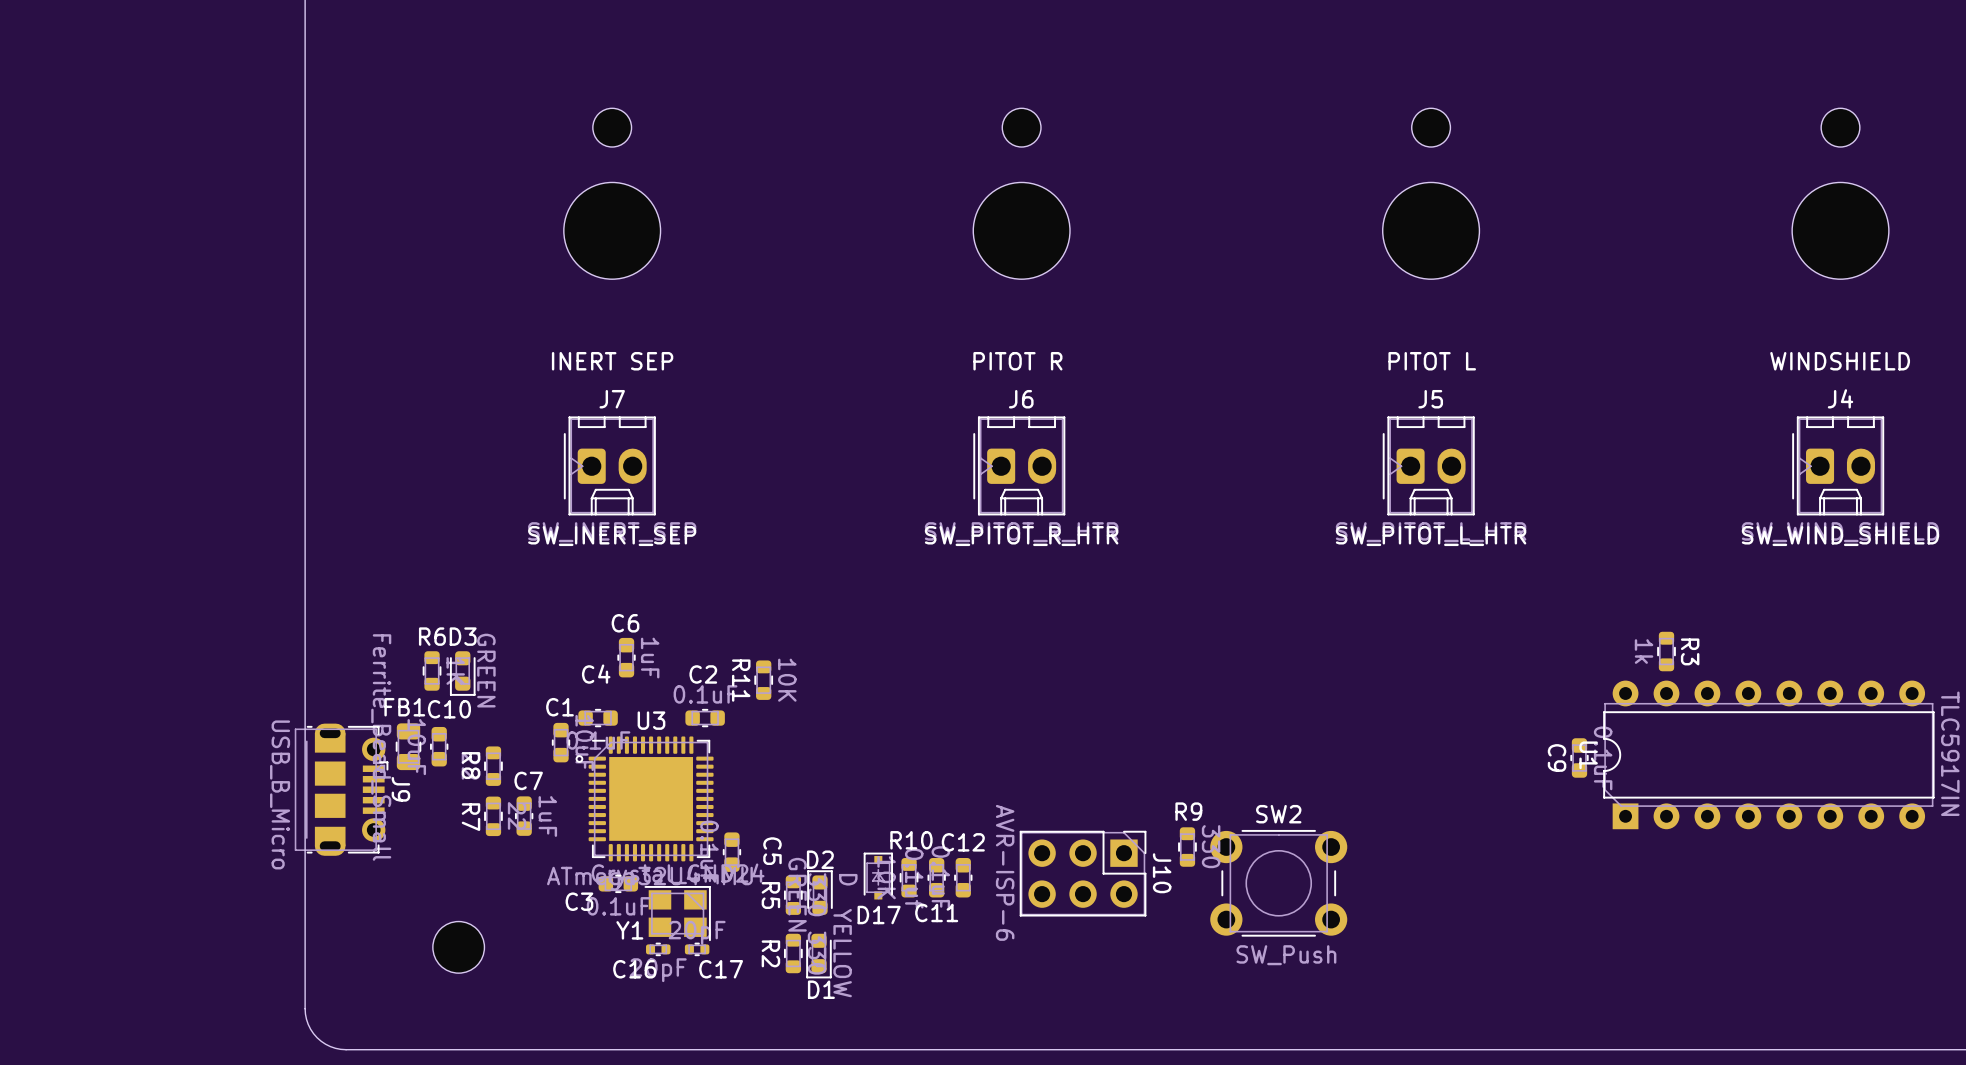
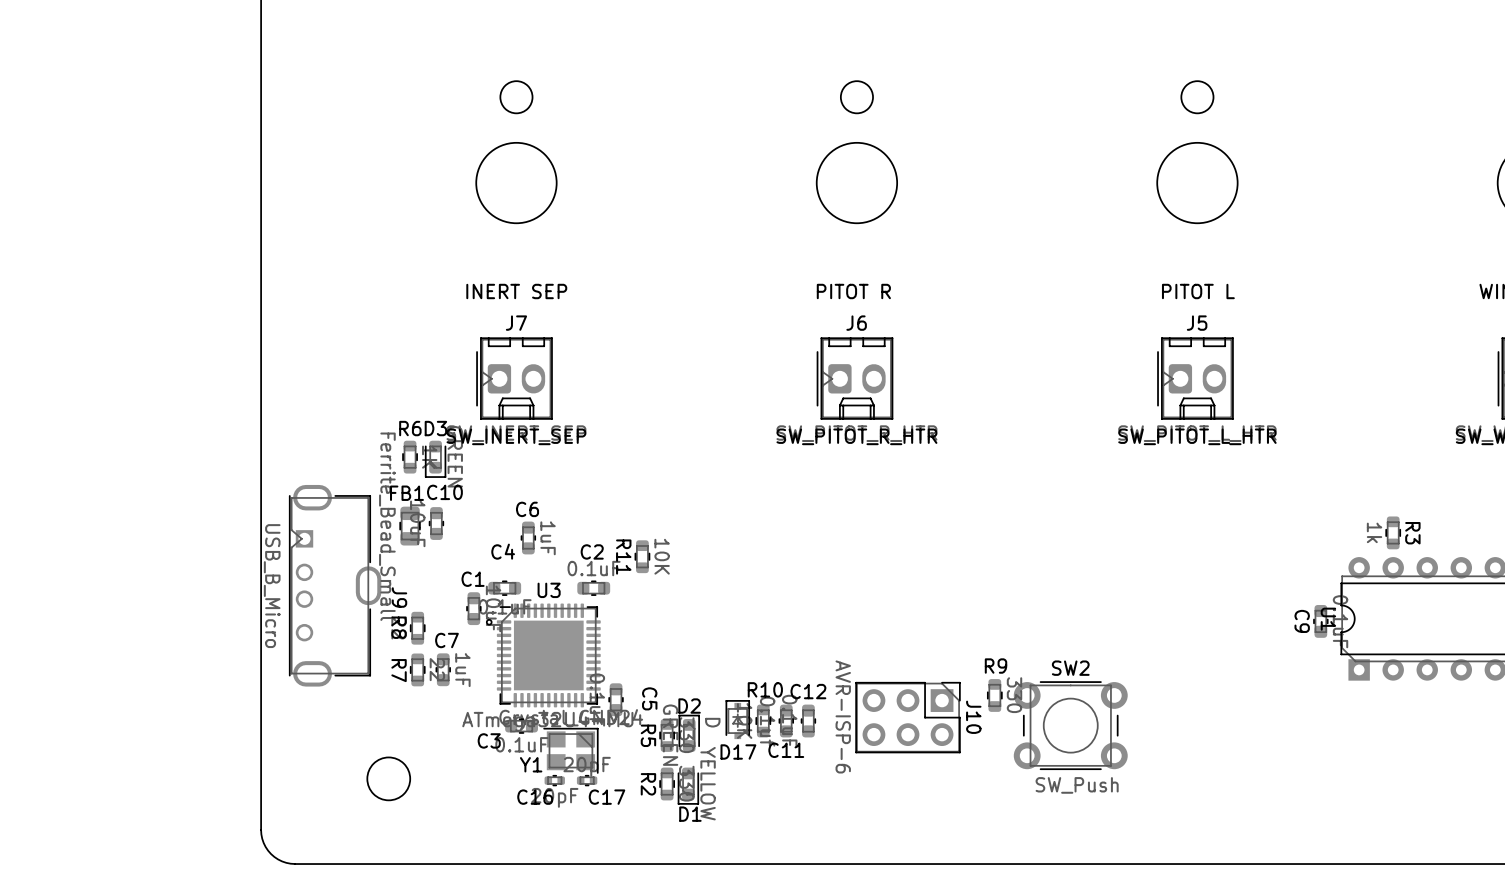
R6 position: (432, 670) -> (410, 457)
D3 position: (462, 673) -> (435, 459)
J9 footprint: [294, 723, 389, 856] -> [288, 484, 382, 687]
FB1 position: (408, 746) -> (410, 526)
C10 position: (439, 746) -> (436, 523)

